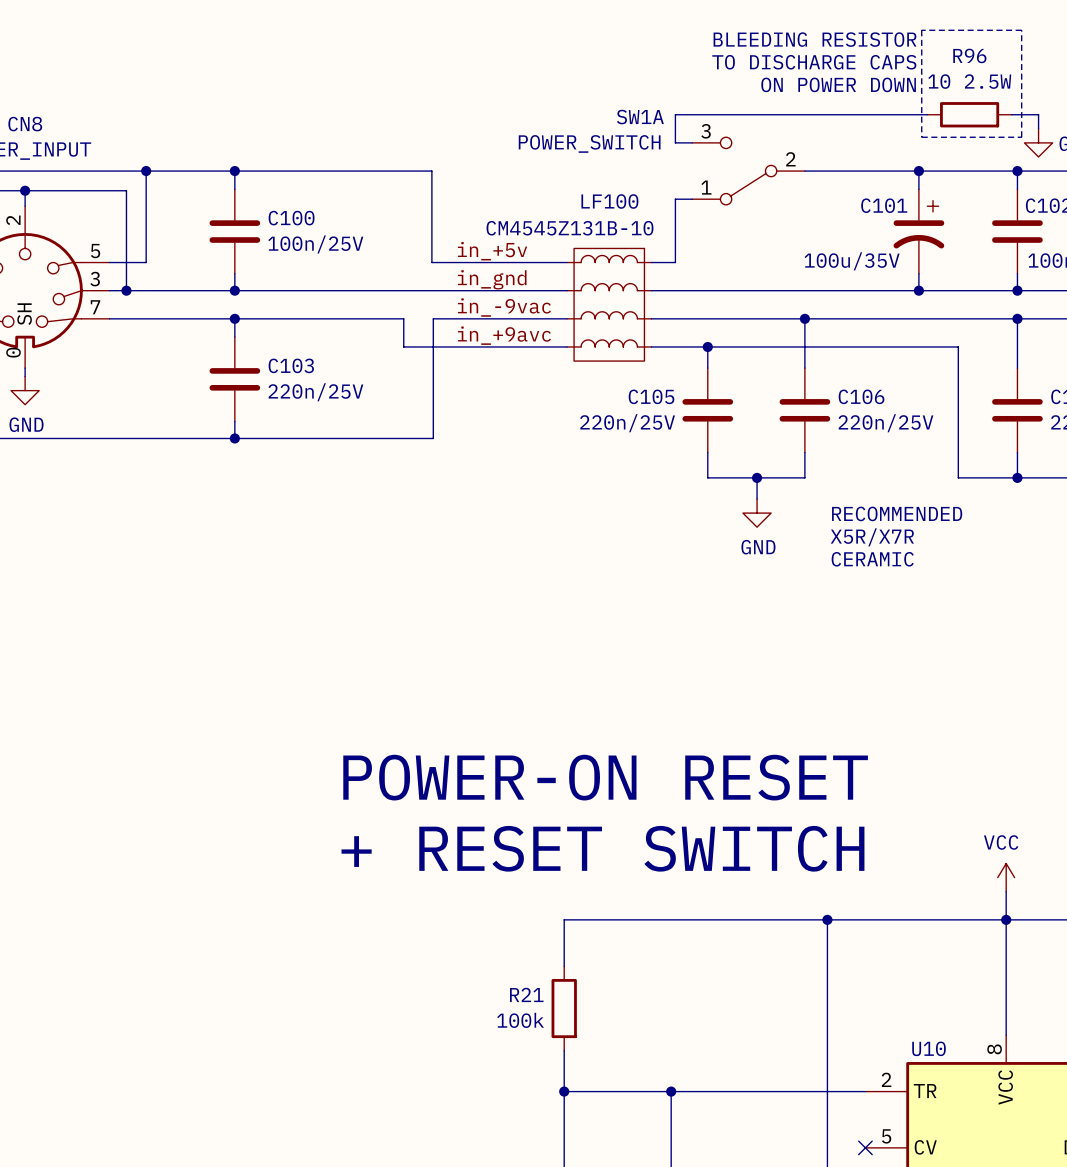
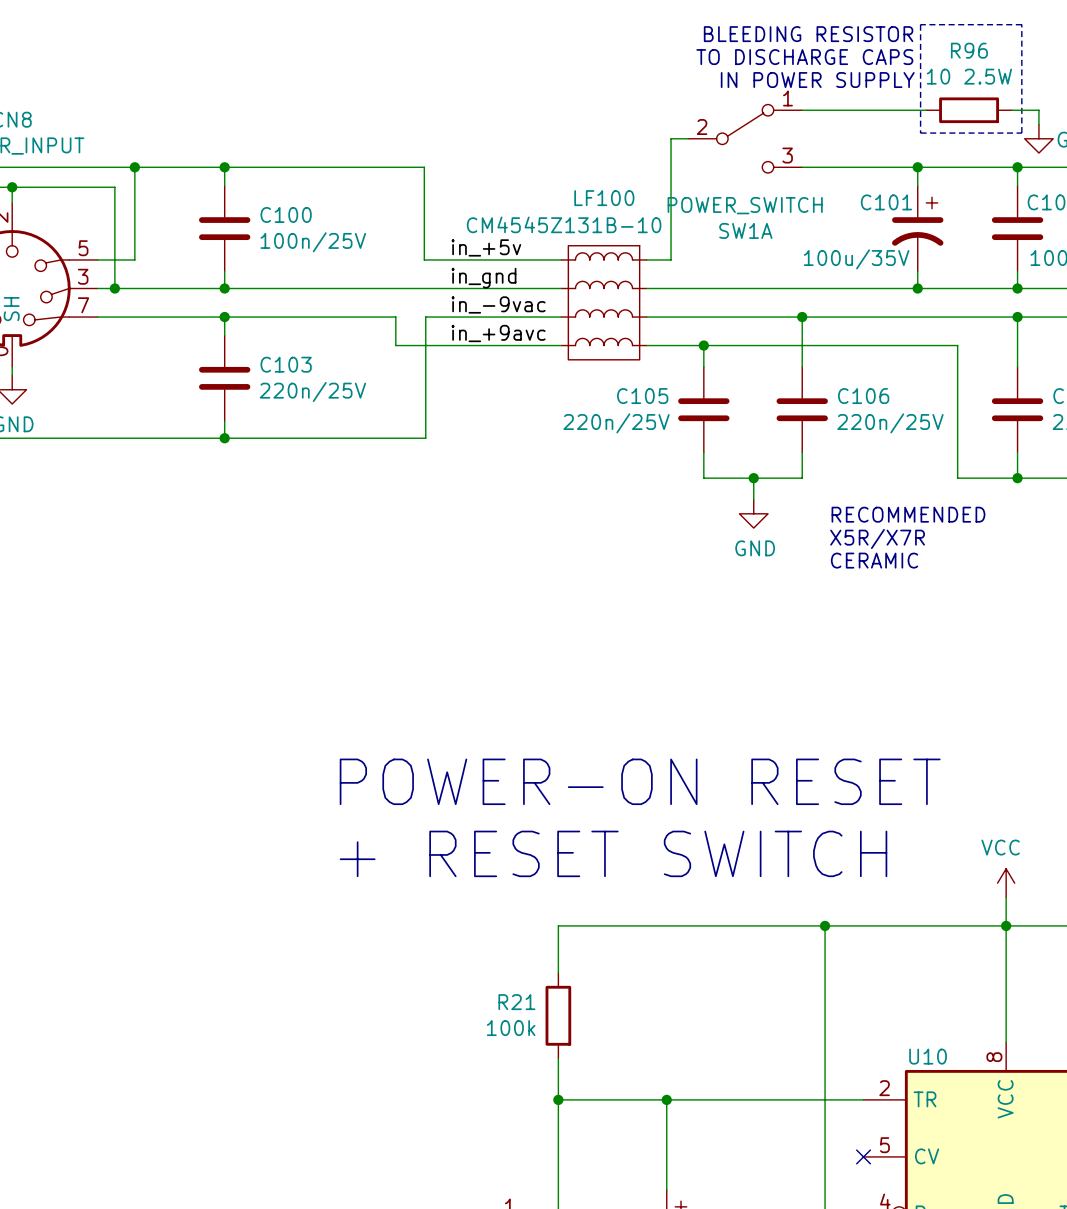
text: ON POWER DOWN (838, 84) -> IN POWER SUPPLY (817, 80)
wire: (804, 114) (675, 114) (675, 142) -> none
SW1A name position: SW1A (640, 117) -> SW1A (745, 230)
SW1A value position: POWER_SWITCH (589, 143) -> POWER_SWITCH (745, 205)
SW1A rotation: 0° (748, 171) -> 180° (745, 138)
wire: (675, 199) (692, 199) -> (671, 195) (671, 138)

